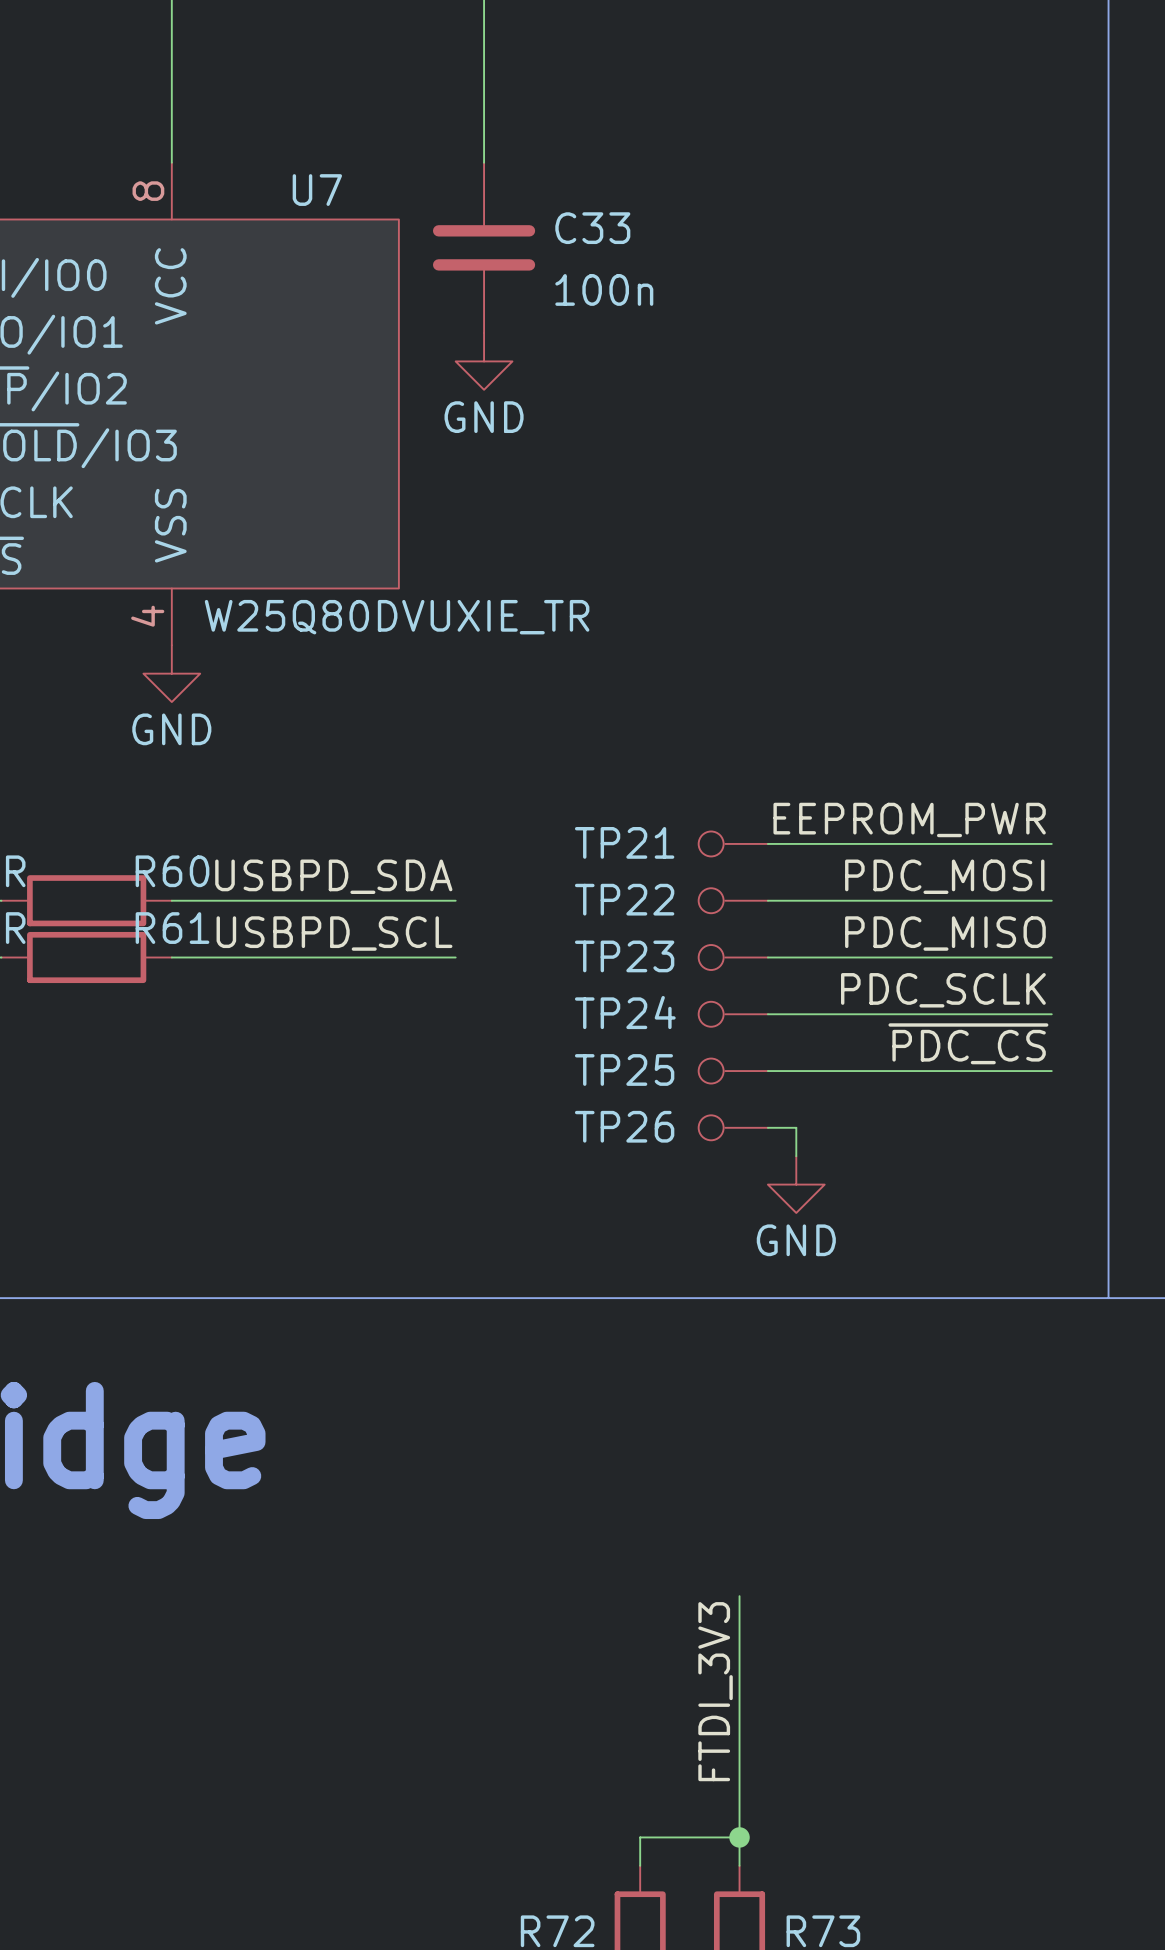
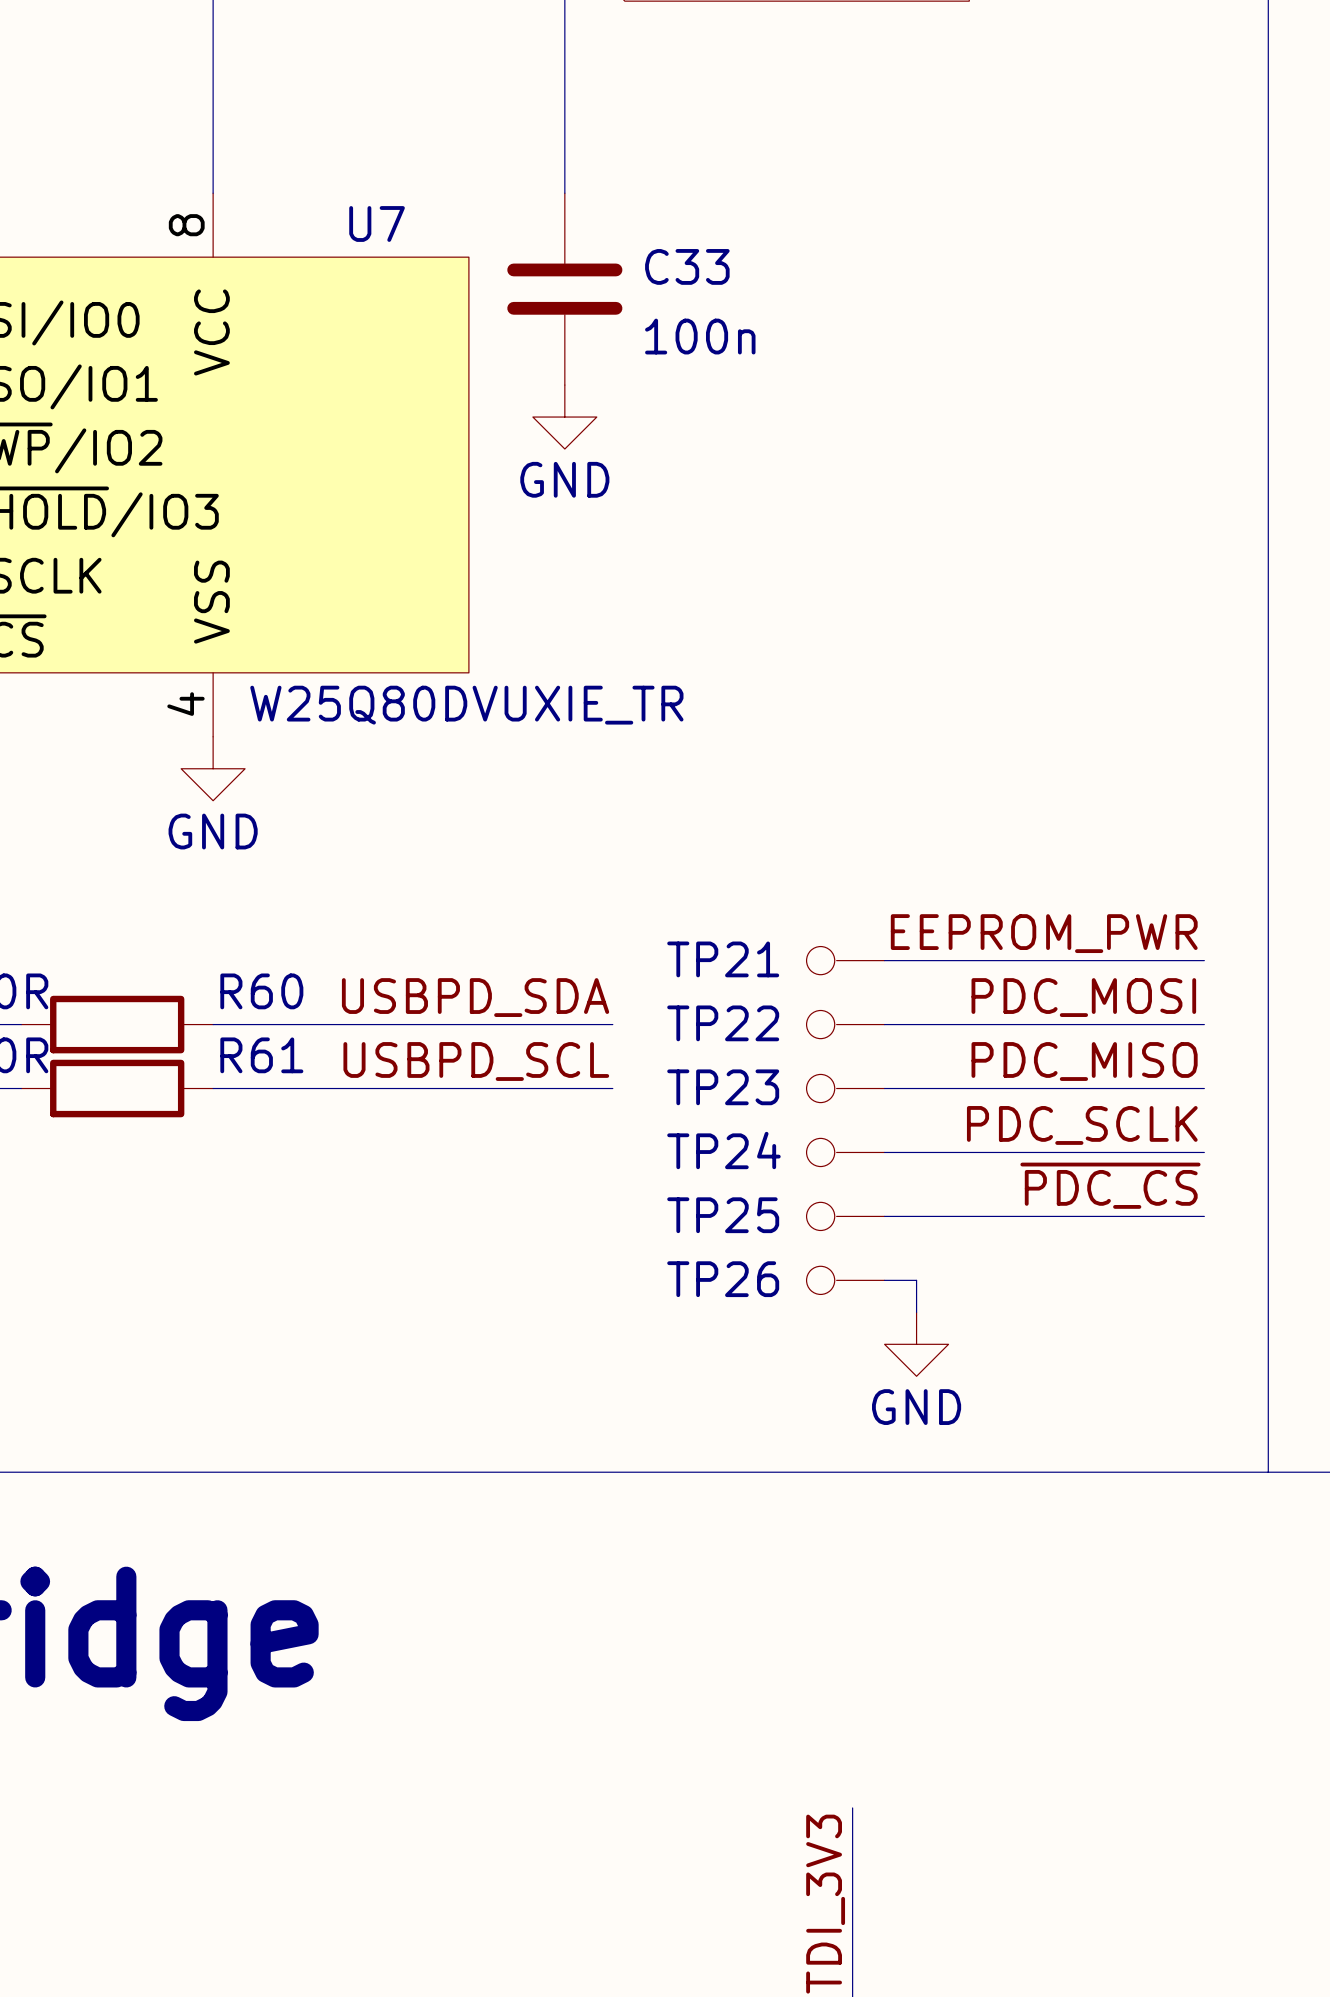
R60 name position: R60 (172, 871) -> R60 (261, 991)
label position: USBPD_SDA (333, 876) -> USBPD_SDA (475, 997)
wire: none -> (532, 1024) (612, 1024)
R61 name position: R61 (172, 928) -> R61 (261, 1055)
label position: USBPD_SCL (334, 933) -> USBPD_SCL (476, 1061)
wire: none -> (532, 1088) (612, 1088)

